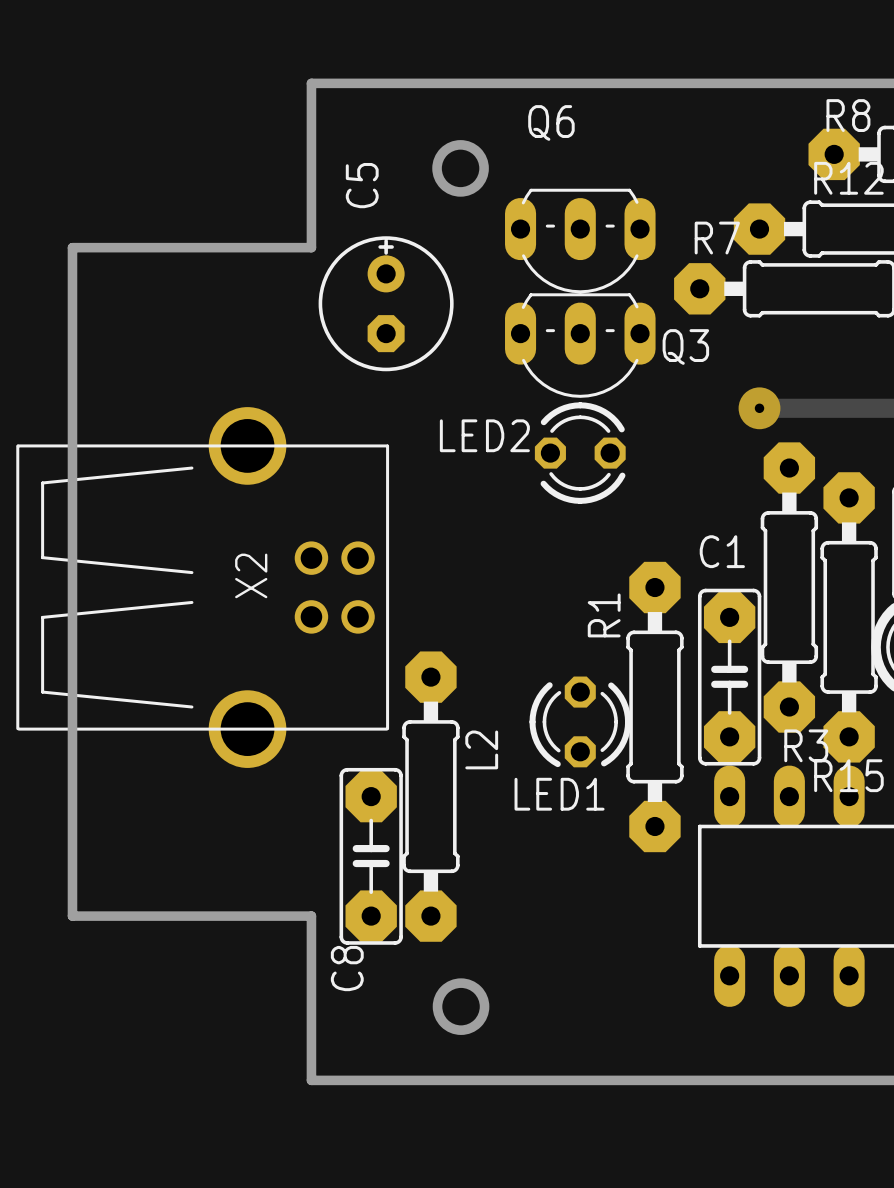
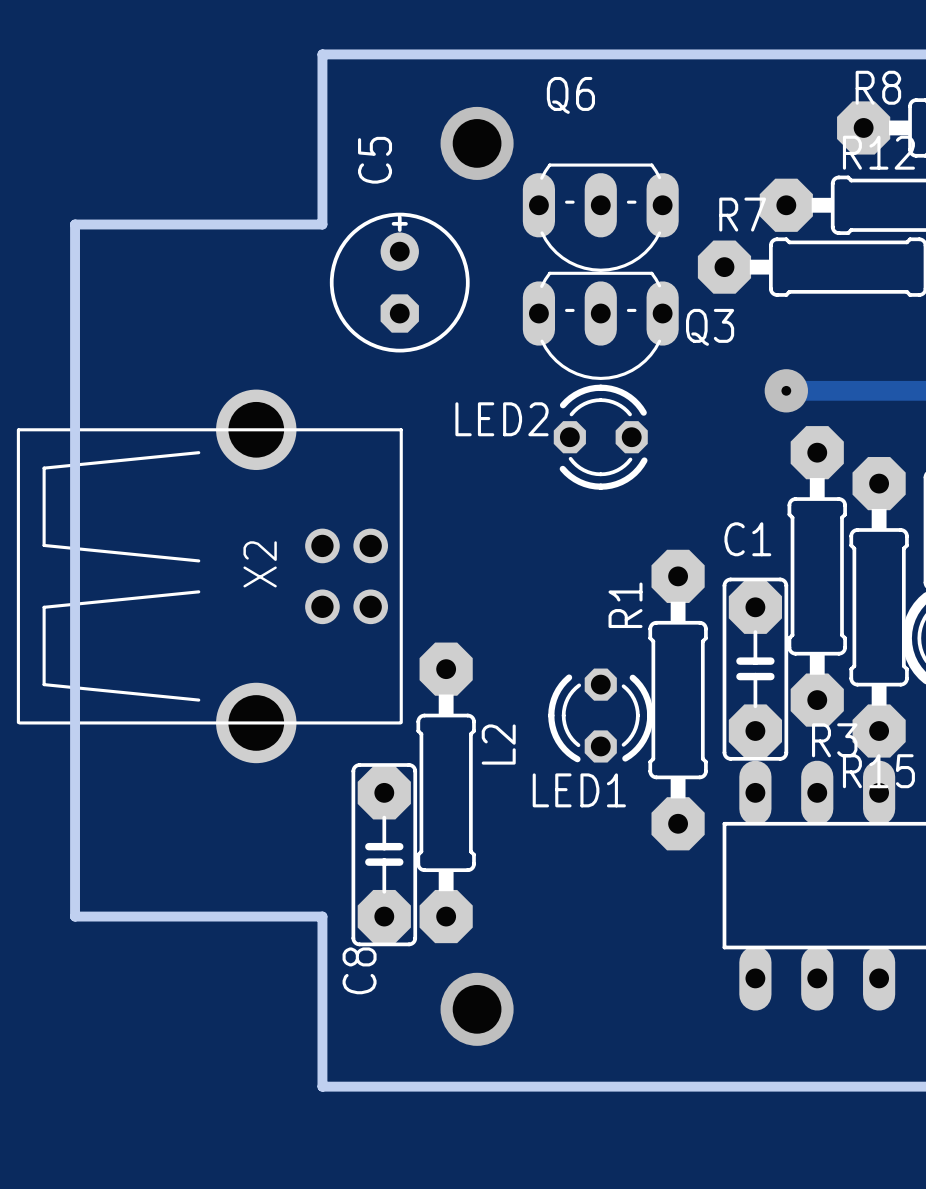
round board edge: [432, 140, 489, 197] -> none
via: none -> (477, 143)
round board edge: [432, 978, 490, 1035] -> none
via: none -> (477, 1009)

